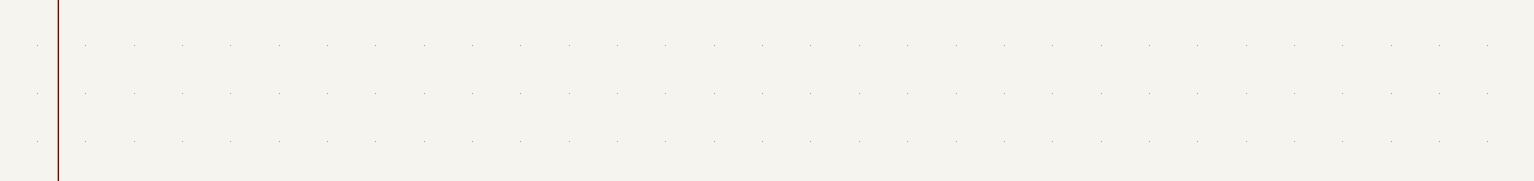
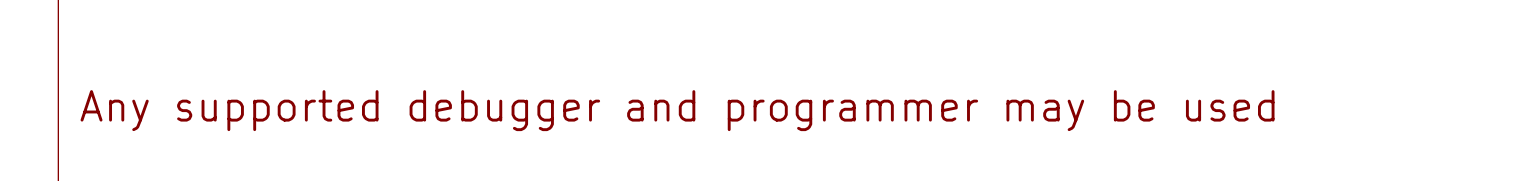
title block: none -> Any supported debugger and programmer may be used (677, 110)

